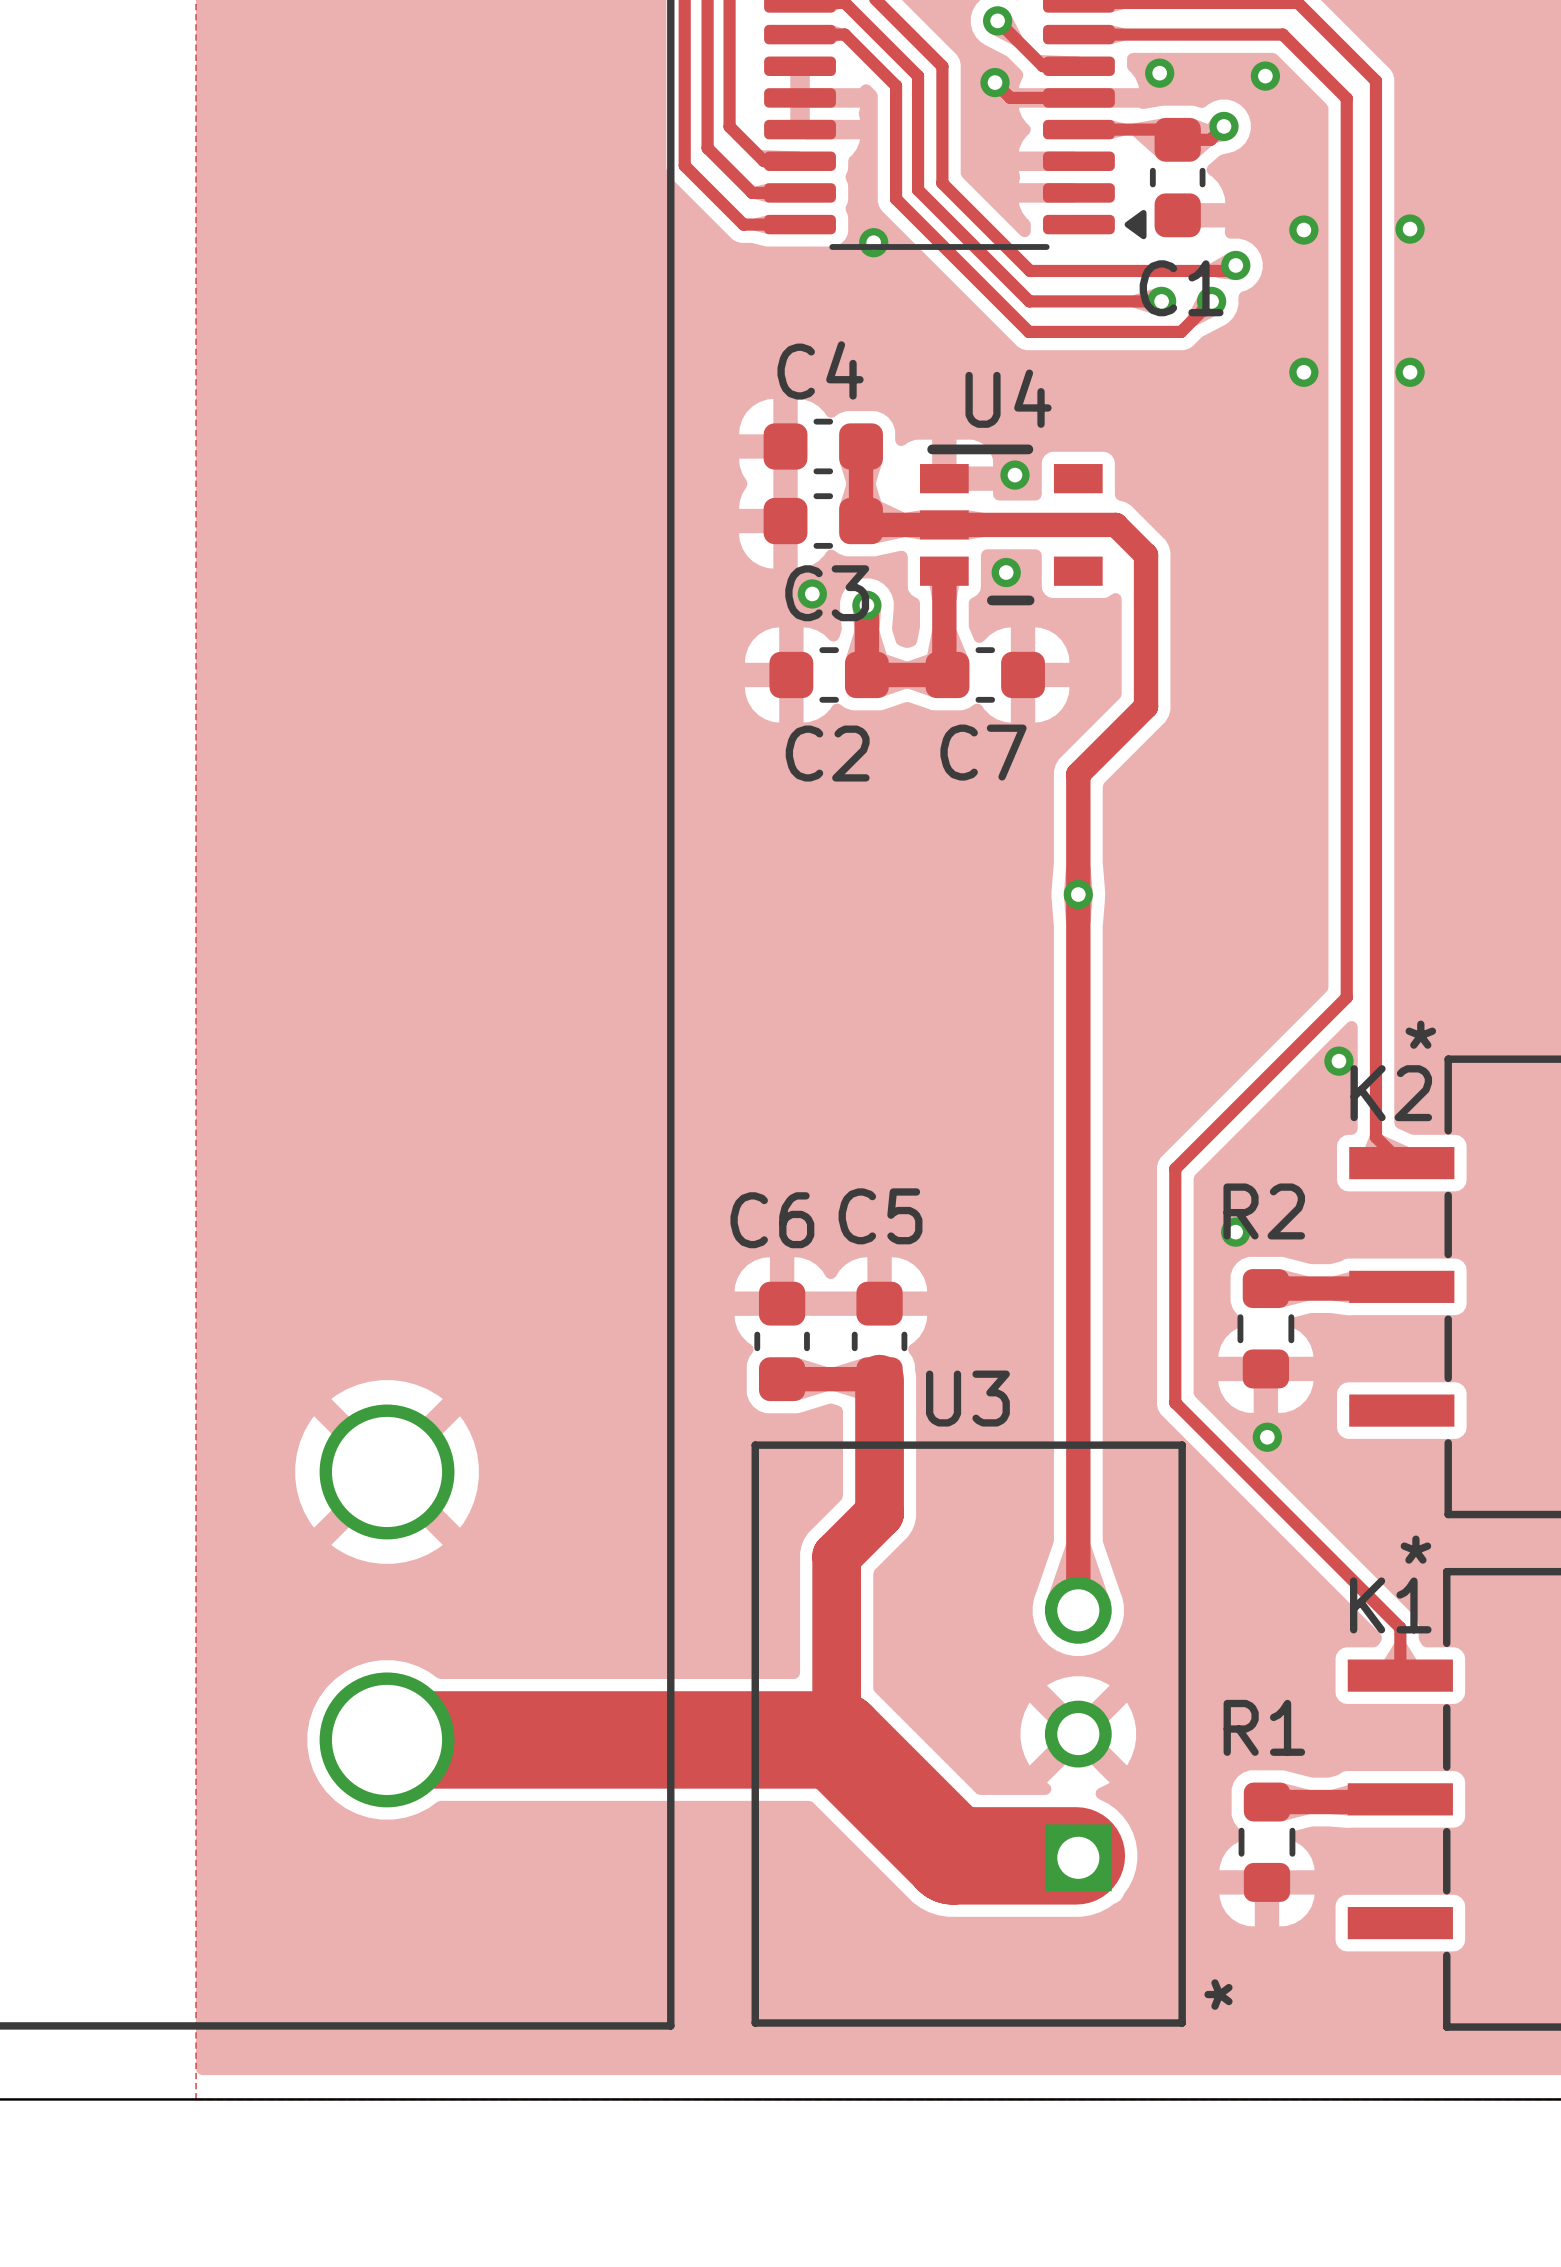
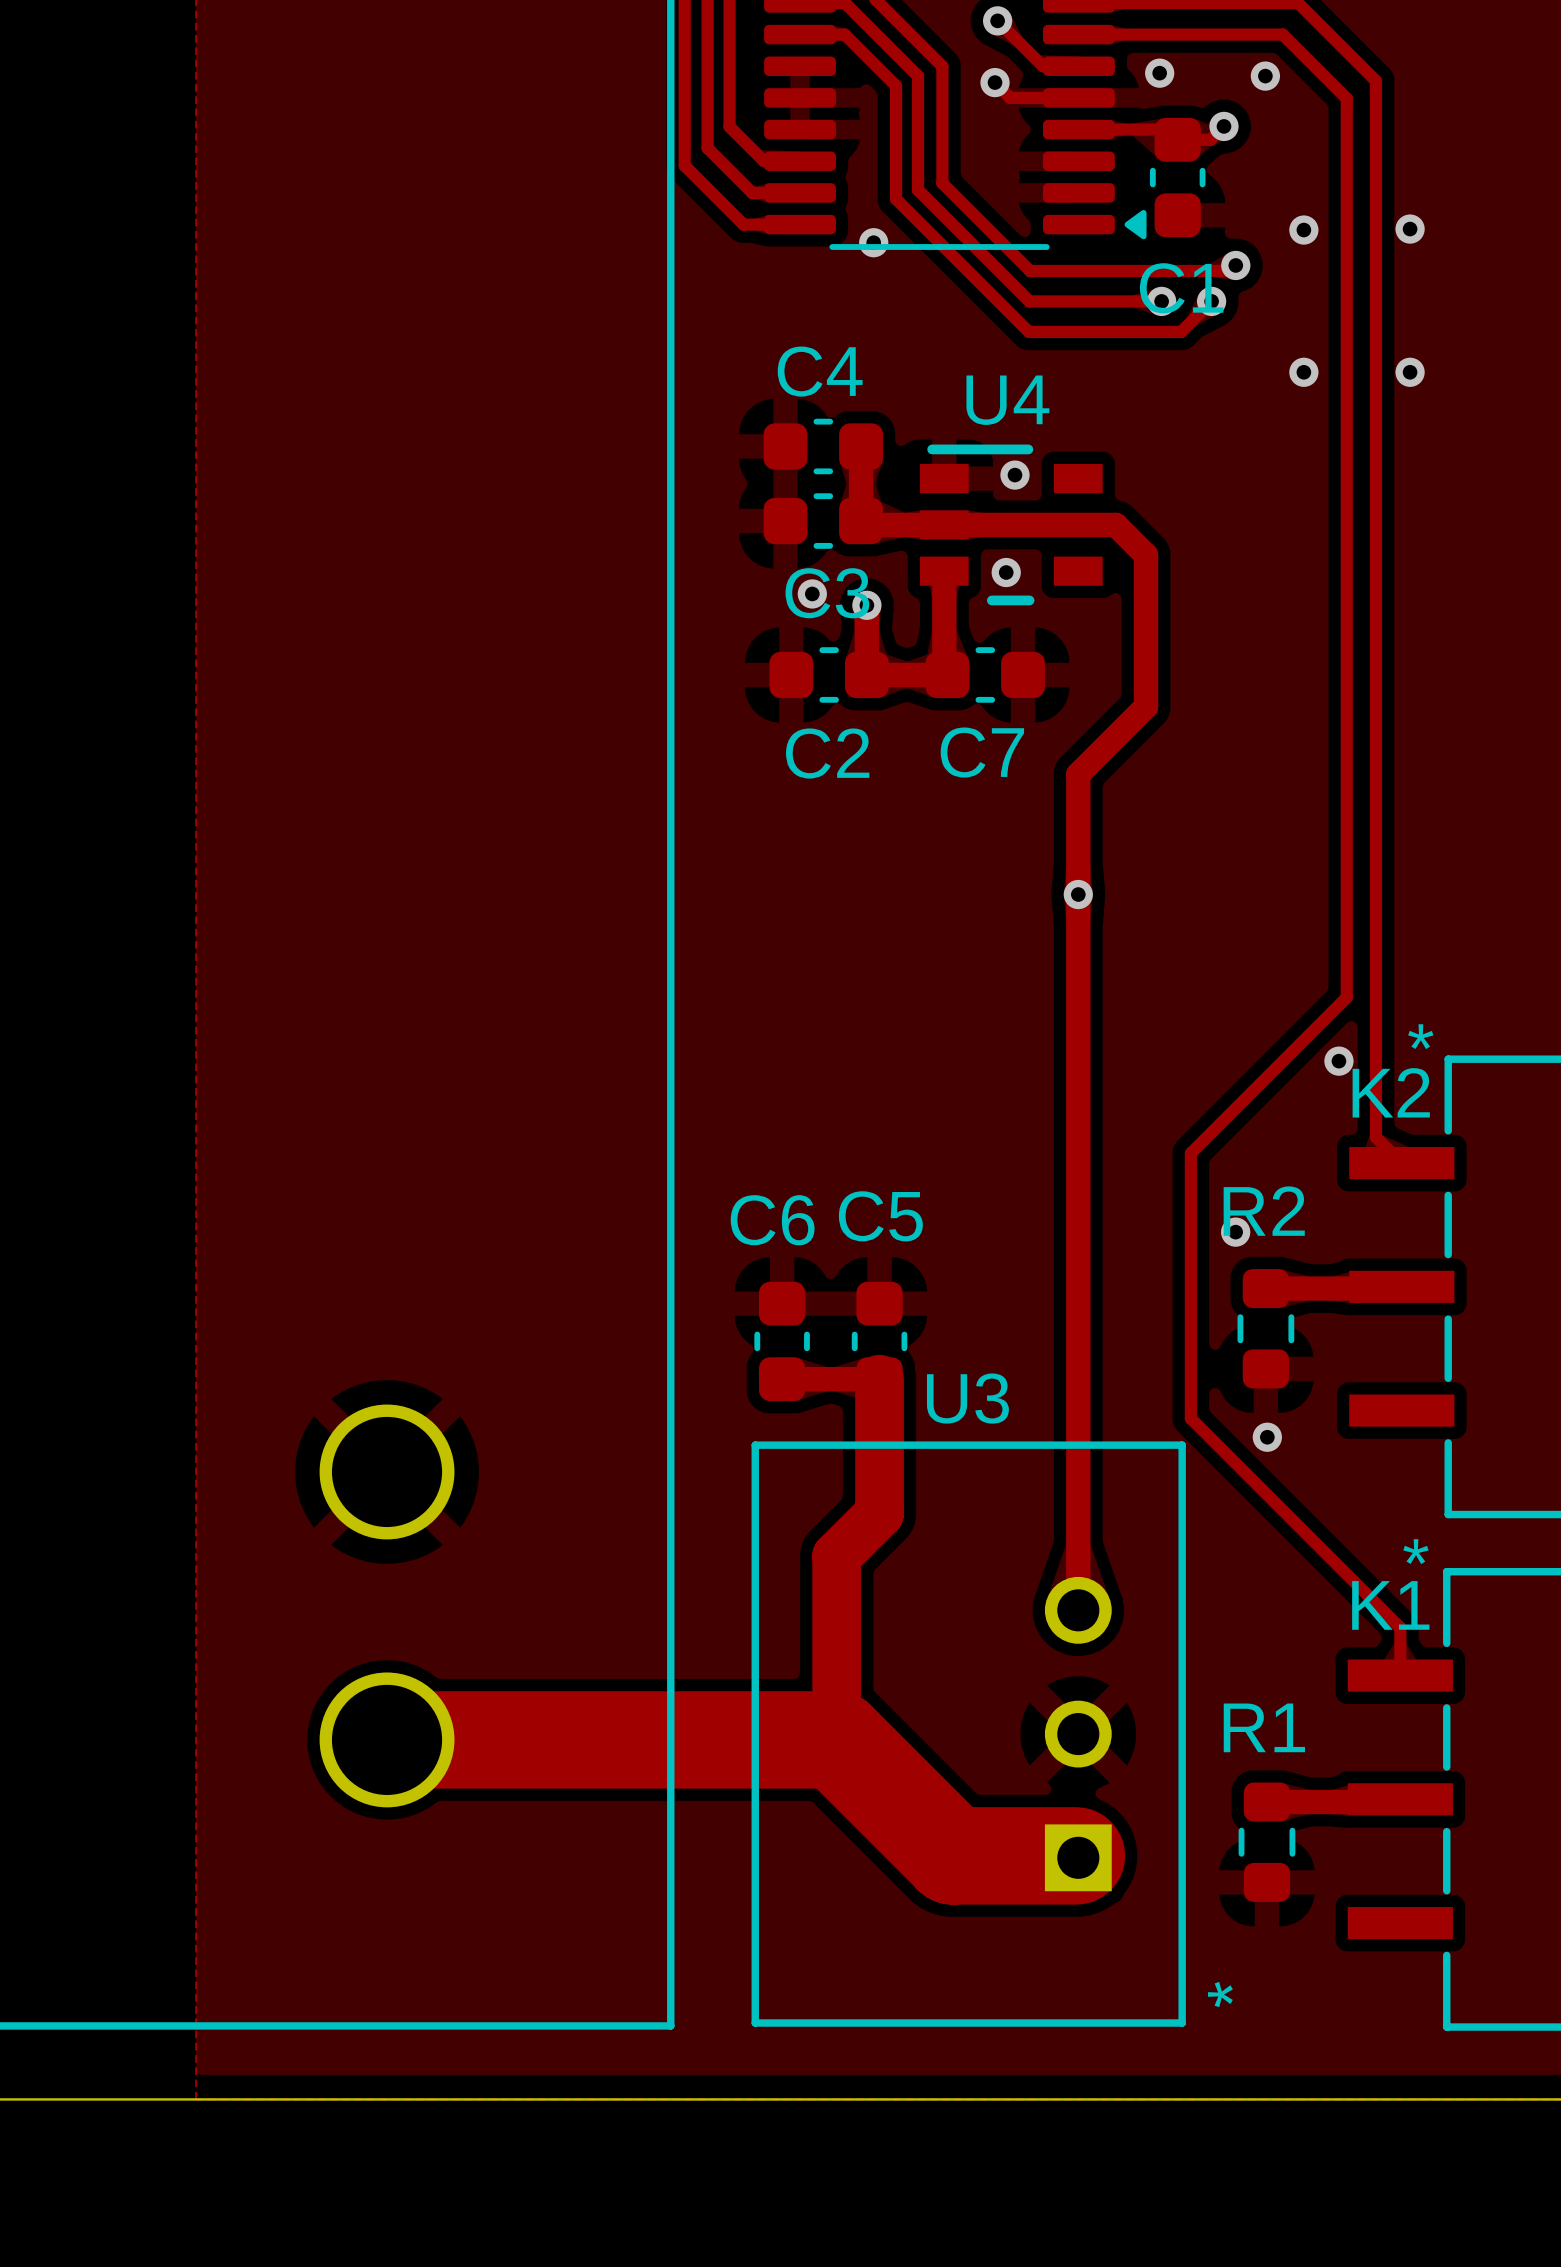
track: (1190, 1153) (1175, 1168) (1175, 1402) (1190, 1418) -> (1190, 1153) (1190, 1418)

